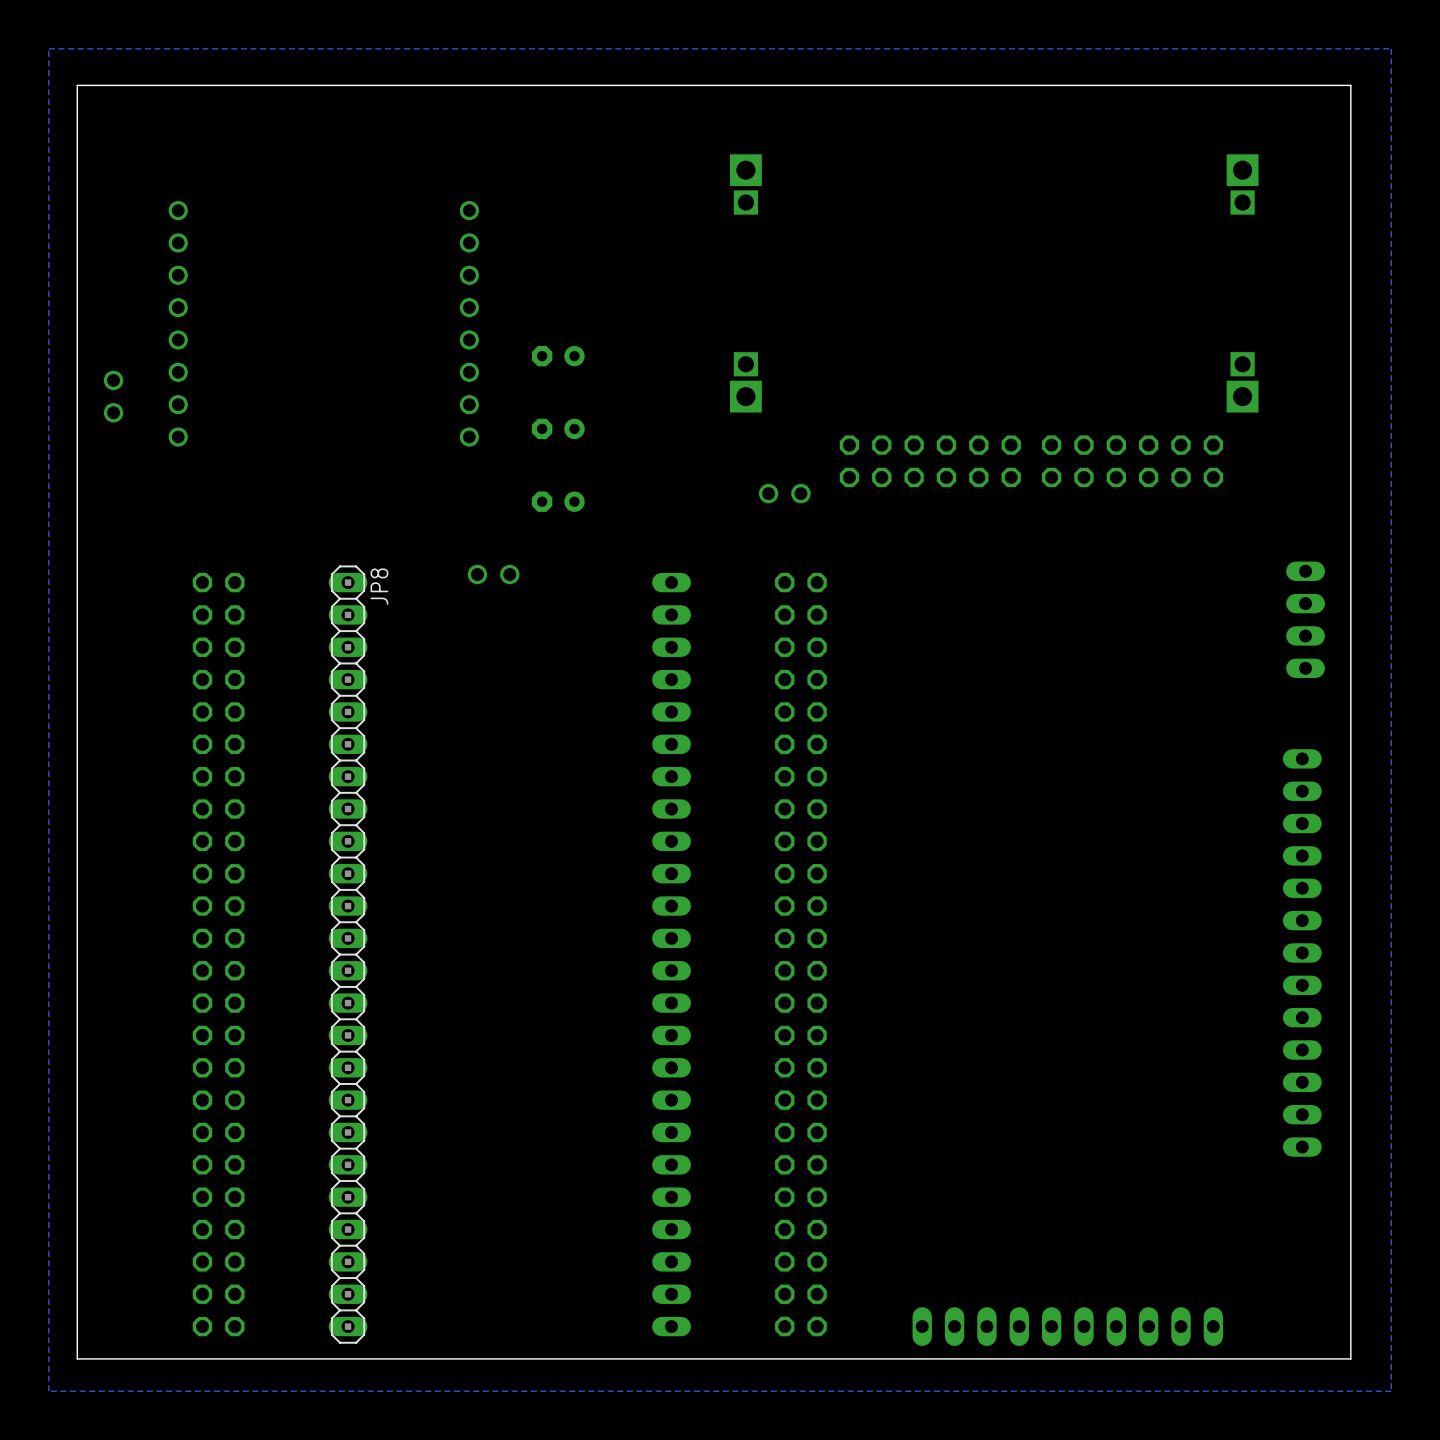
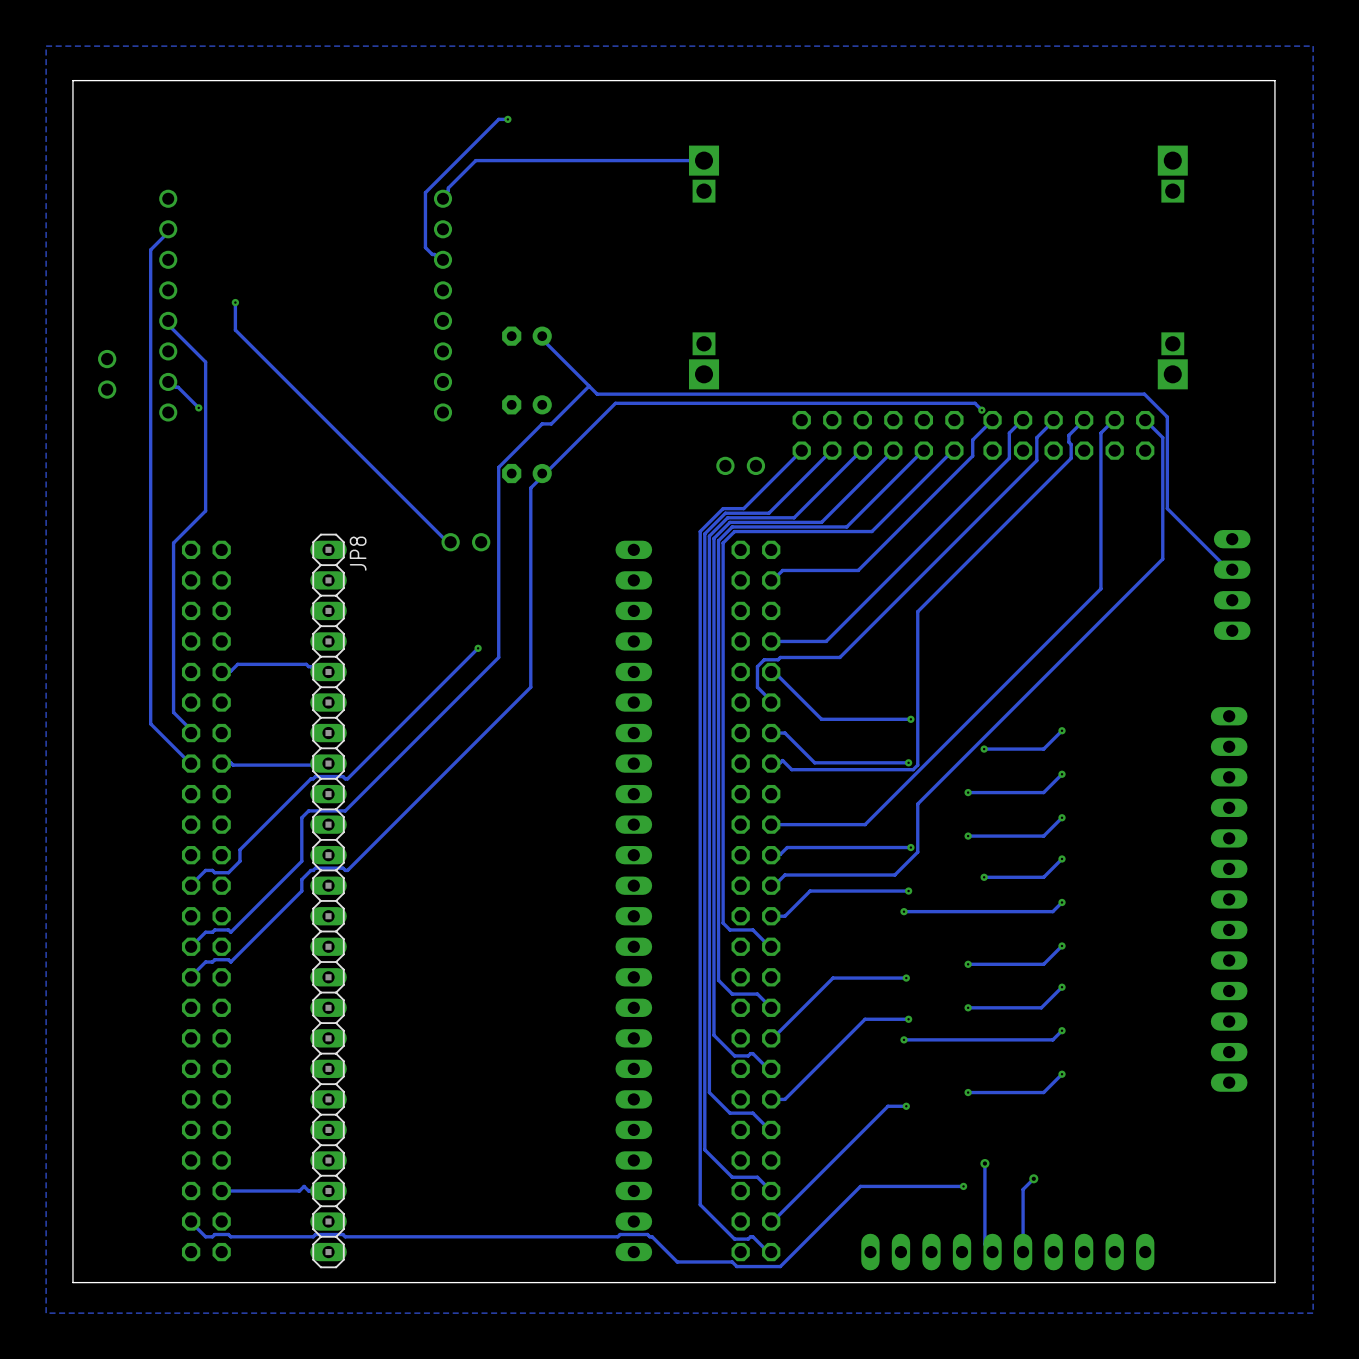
track: none -> (507, 119) (498, 119) (425, 192) (425, 247) (441, 261) (443, 259)
via: none -> (507, 119)
track: none -> (704, 160) (475, 160) (448, 188) (441, 197) (443, 198)
track: none -> (168, 229) (166, 233) (150, 249) (150, 723) (191, 763)
track: none -> (235, 302) (235, 330) (446, 540) (450, 542)
via: none -> (235, 302)
track: none -> (168, 320) (168, 325) (205, 362) (205, 510) (173, 542) (173, 712) (189, 728) (191, 733)
track: none -> (542, 336) (542, 339) (597, 394) (1144, 394) (1167, 417) (1167, 508) (1226, 568) (1232, 569)
track: none -> (168, 381) (168, 380) (178, 387) (198, 407)
track: none -> (589, 386) (551, 423) (542, 423) (498, 467) (498, 657) (345, 810) (308, 810) (301, 817) (301, 861) (230, 932) (228, 929) (205, 932) (191, 946)
via: none -> (198, 407)
track: none -> (981, 410) (975, 403) (615, 403) (546, 472) (542, 472) (542, 476) (530, 488) (530, 687) (347, 870) (343, 868) (315, 868) (310, 870) (301, 879) (301, 891) (230, 962) (228, 959) (205, 962) (191, 977)
via: none -> (981, 410)
track: none -> (992, 420) (972, 439) (972, 455) (858, 570) (782, 570) (771, 581) (771, 580)
track: none -> (1023, 420) (1009, 433) (1009, 458) (826, 641) (771, 641)
track: none -> (1053, 420) (1036, 437) (1036, 460) (839, 657) (780, 657) (778, 659) (764, 659) (757, 666) (757, 687) (771, 702)
track: none -> (1084, 420) (1068, 435) (1071, 458) (917, 611) (917, 765) (913, 769) (791, 769) (782, 760) (780, 762) (771, 763)
track: none -> (1114, 420) (1100, 433) (1100, 588) (865, 824) (771, 824)
track: none -> (1145, 420) (1162, 437) (1162, 559) (917, 804) (917, 852) (894, 875) (784, 875) (775, 884) (771, 885)
track: none -> (801, 450) (743, 508) (723, 508) (700, 531) (700, 1204) (734, 1239) (748, 1239) (752, 1236) (766, 1250) (771, 1252)
track: none -> (832, 450) (768, 513) (725, 513) (704, 533) (704, 1149) (732, 1177) (757, 1177) (771, 1191)
track: none -> (862, 450) (794, 517) (727, 517) (709, 536) (709, 1092) (729, 1113) (752, 1113) (771, 1131) (771, 1129)
track: none -> (893, 450) (821, 522) (729, 522) (713, 538) (713, 1035) (734, 1055) (748, 1055) (752, 1053) (766, 1067) (771, 1068)
track: none -> (923, 450) (846, 526) (732, 526) (718, 540) (718, 980) (732, 994) (757, 994) (771, 1007)
track: none -> (954, 450) (871, 531) (734, 531) (723, 542) (723, 923) (729, 929) (752, 929) (771, 948) (771, 946)
track: none -> (478, 648) (347, 778) (343, 776) (315, 776) (310, 778) (239, 849) (239, 861) (228, 872) (205, 870) (191, 885)
via: none -> (478, 648)
track: none -> (328, 671) (315, 671) (306, 664) (237, 664) (230, 671) (221, 671)
track: none -> (771, 671) (775, 673) (821, 719) (910, 719)
via: none -> (910, 719)
track: none -> (1062, 730) (1043, 749) (984, 749)
via: none -> (1062, 730)
track: none -> (771, 733) (784, 733) (814, 762) (908, 762)
via: none -> (984, 749)
via: none -> (908, 762)
track: none -> (328, 763) (326, 765) (221, 763)
track: none -> (1062, 774) (1043, 792) (968, 792)
via: none -> (1062, 774)
via: none -> (968, 792)
track: none -> (1062, 817) (1043, 836) (968, 836)
via: none -> (1062, 817)
via: none -> (968, 836)
track: none -> (910, 847) (787, 847) (780, 854) (771, 855)
via: none -> (910, 847)
track: none -> (1062, 858) (1043, 877) (984, 877)
via: none -> (1062, 858)
via: none -> (984, 877)
track: none -> (908, 891) (810, 891) (784, 916) (771, 916)
via: none -> (908, 891)
track: none -> (1062, 902) (1052, 911) (904, 911)
via: none -> (1062, 902)
via: none -> (904, 911)
track: none -> (1062, 945) (1043, 964) (968, 964)
via: none -> (1062, 945)
via: none -> (968, 964)
track: none -> (906, 978) (833, 978) (771, 1039) (771, 1038)
via: none -> (906, 978)
track: none -> (1062, 987) (1041, 1007) (968, 1007)
via: none -> (1062, 987)
via: none -> (968, 1007)
track: none -> (908, 1019) (865, 1019) (784, 1099) (771, 1099)
via: none -> (908, 1019)
track: none -> (1062, 1030) (1052, 1039) (904, 1039)
via: none -> (1062, 1030)
via: none -> (904, 1039)
track: none -> (1062, 1074) (1043, 1092) (968, 1092)
via: none -> (1062, 1074)
via: none -> (968, 1092)
track: none -> (906, 1106) (887, 1106) (771, 1223) (771, 1221)
via: none -> (906, 1106)
track: none -> (984, 1163) (984, 1244) (992, 1252)
via: none -> (984, 1163)
track: none -> (1033, 1178) (1023, 1189) (1023, 1252)
via: none -> (1033, 1178)
track: none -> (963, 1186) (860, 1186) (780, 1266) (736, 1266) (732, 1261) (677, 1261) (647, 1234) (620, 1234) (617, 1236) (345, 1236) (343, 1234) (315, 1234) (313, 1236) (230, 1236) (228, 1234) (214, 1234) (212, 1236) (205, 1236) (191, 1221)
via: none -> (963, 1186)
track: none -> (328, 1191) (308, 1191) (304, 1186) (299, 1191) (221, 1191)

